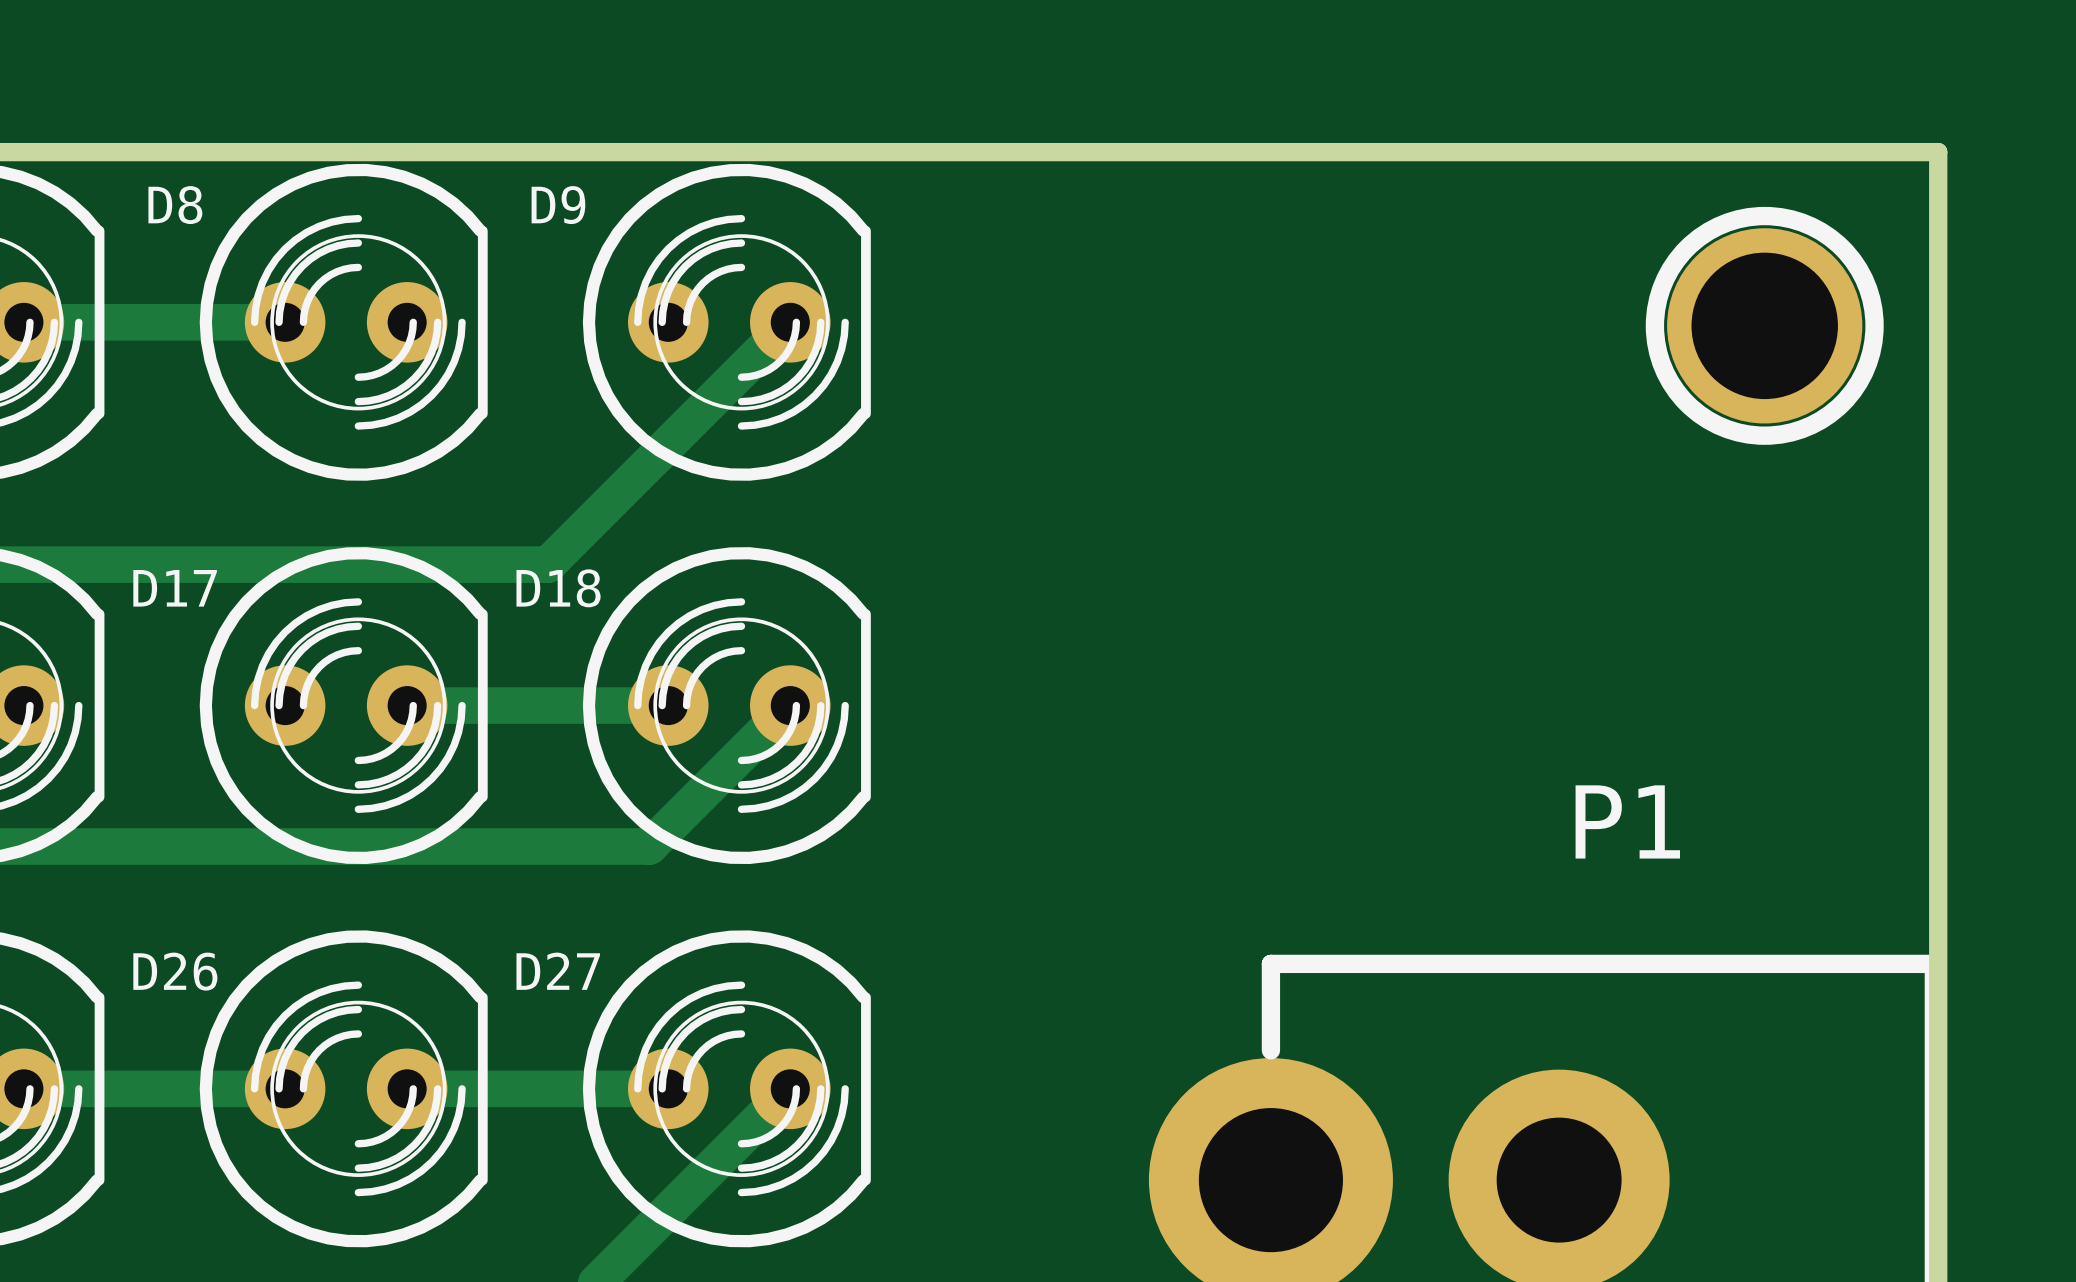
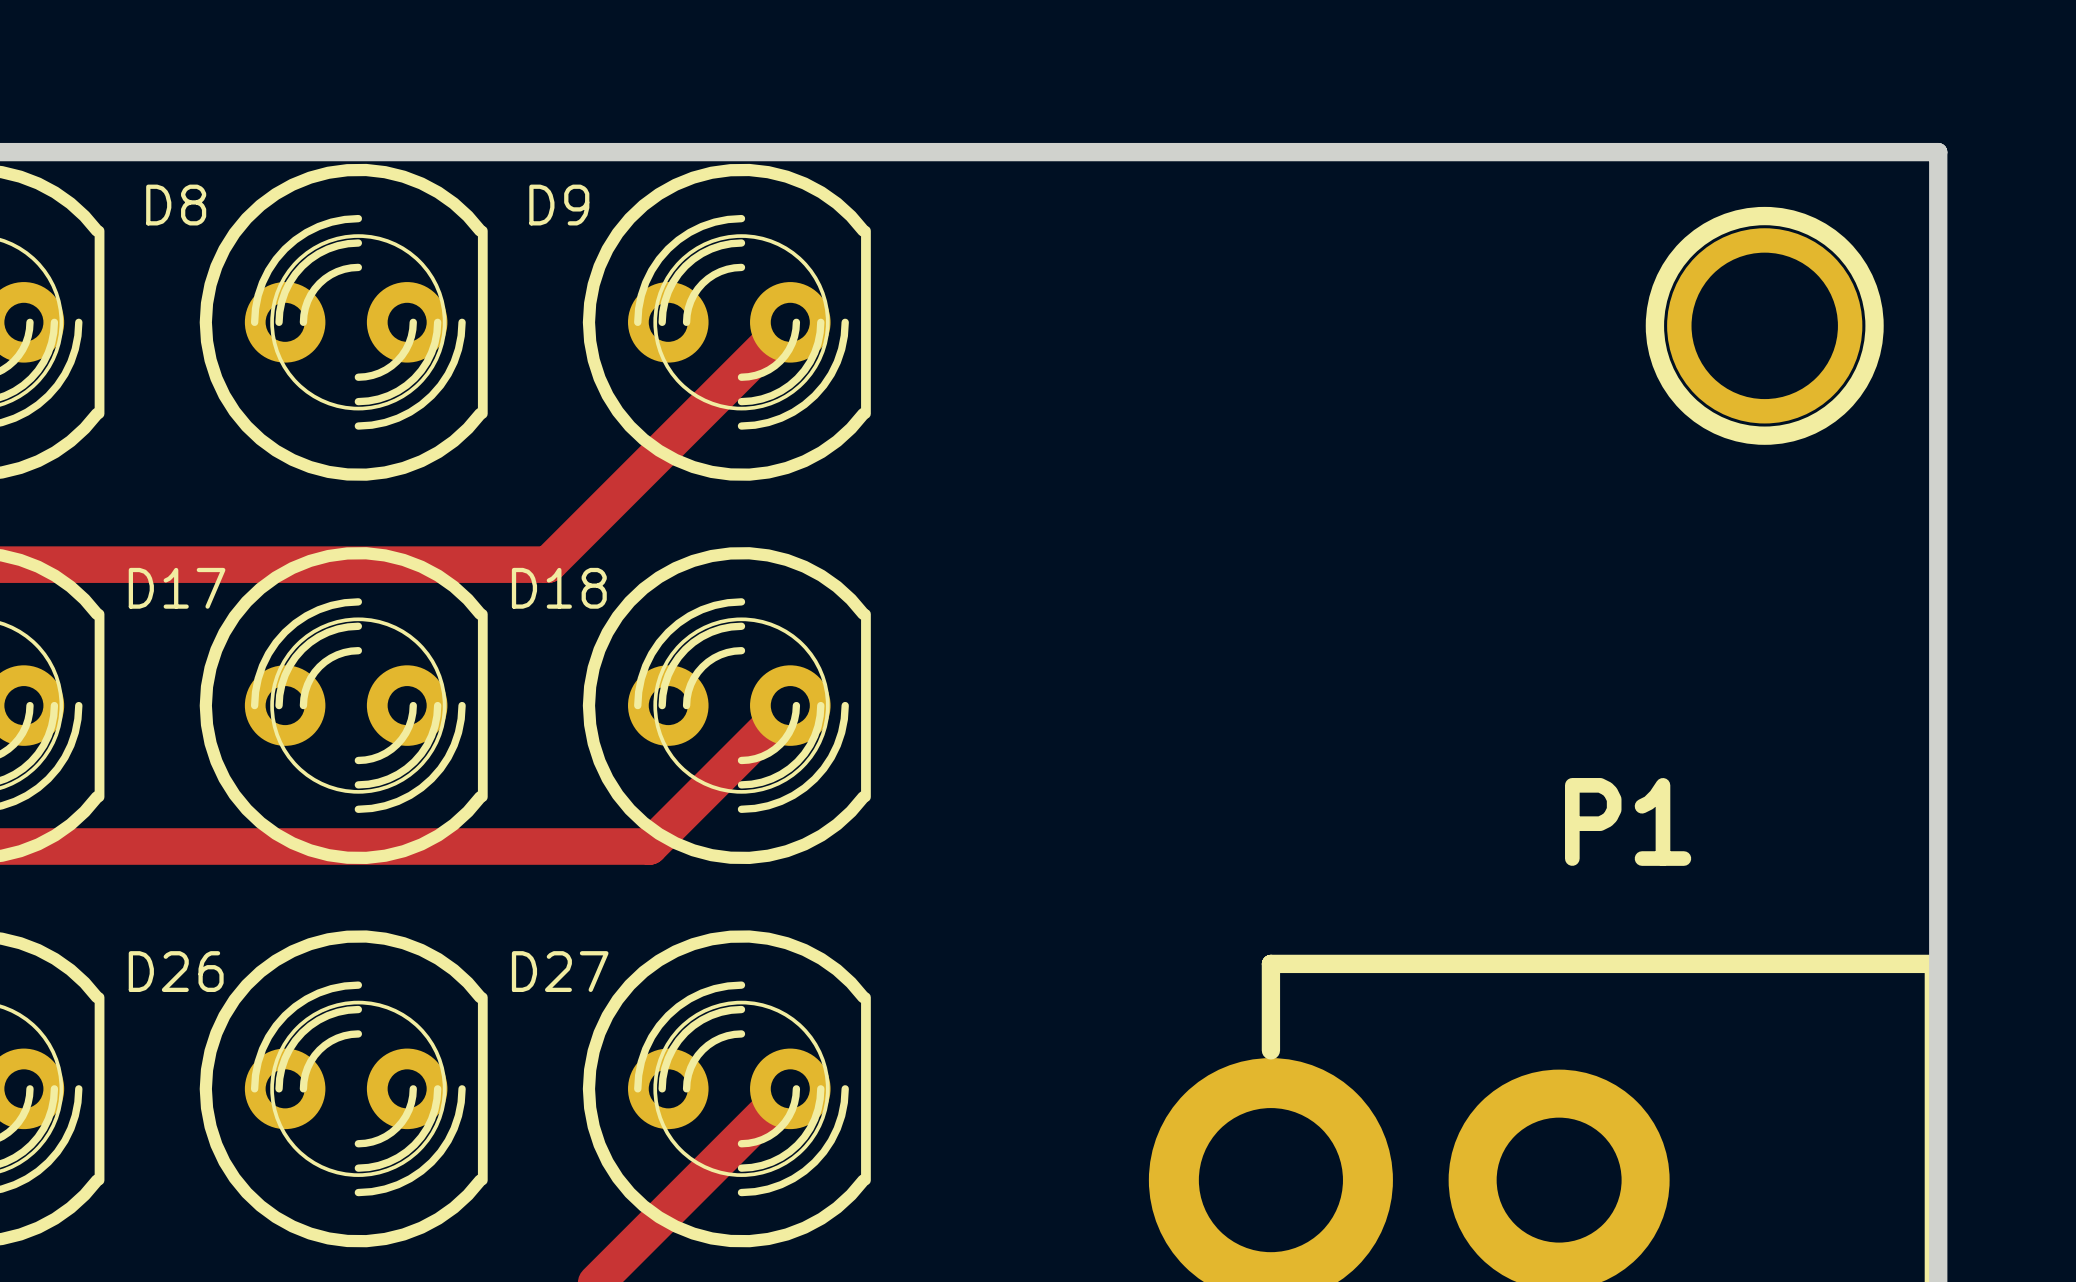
track: (23, 322) (285, 322) -> none
track: (407, 705) (668, 705) -> none
track: (23, 1088) (285, 1088) -> none
track: (407, 1088) (668, 1088) -> none

